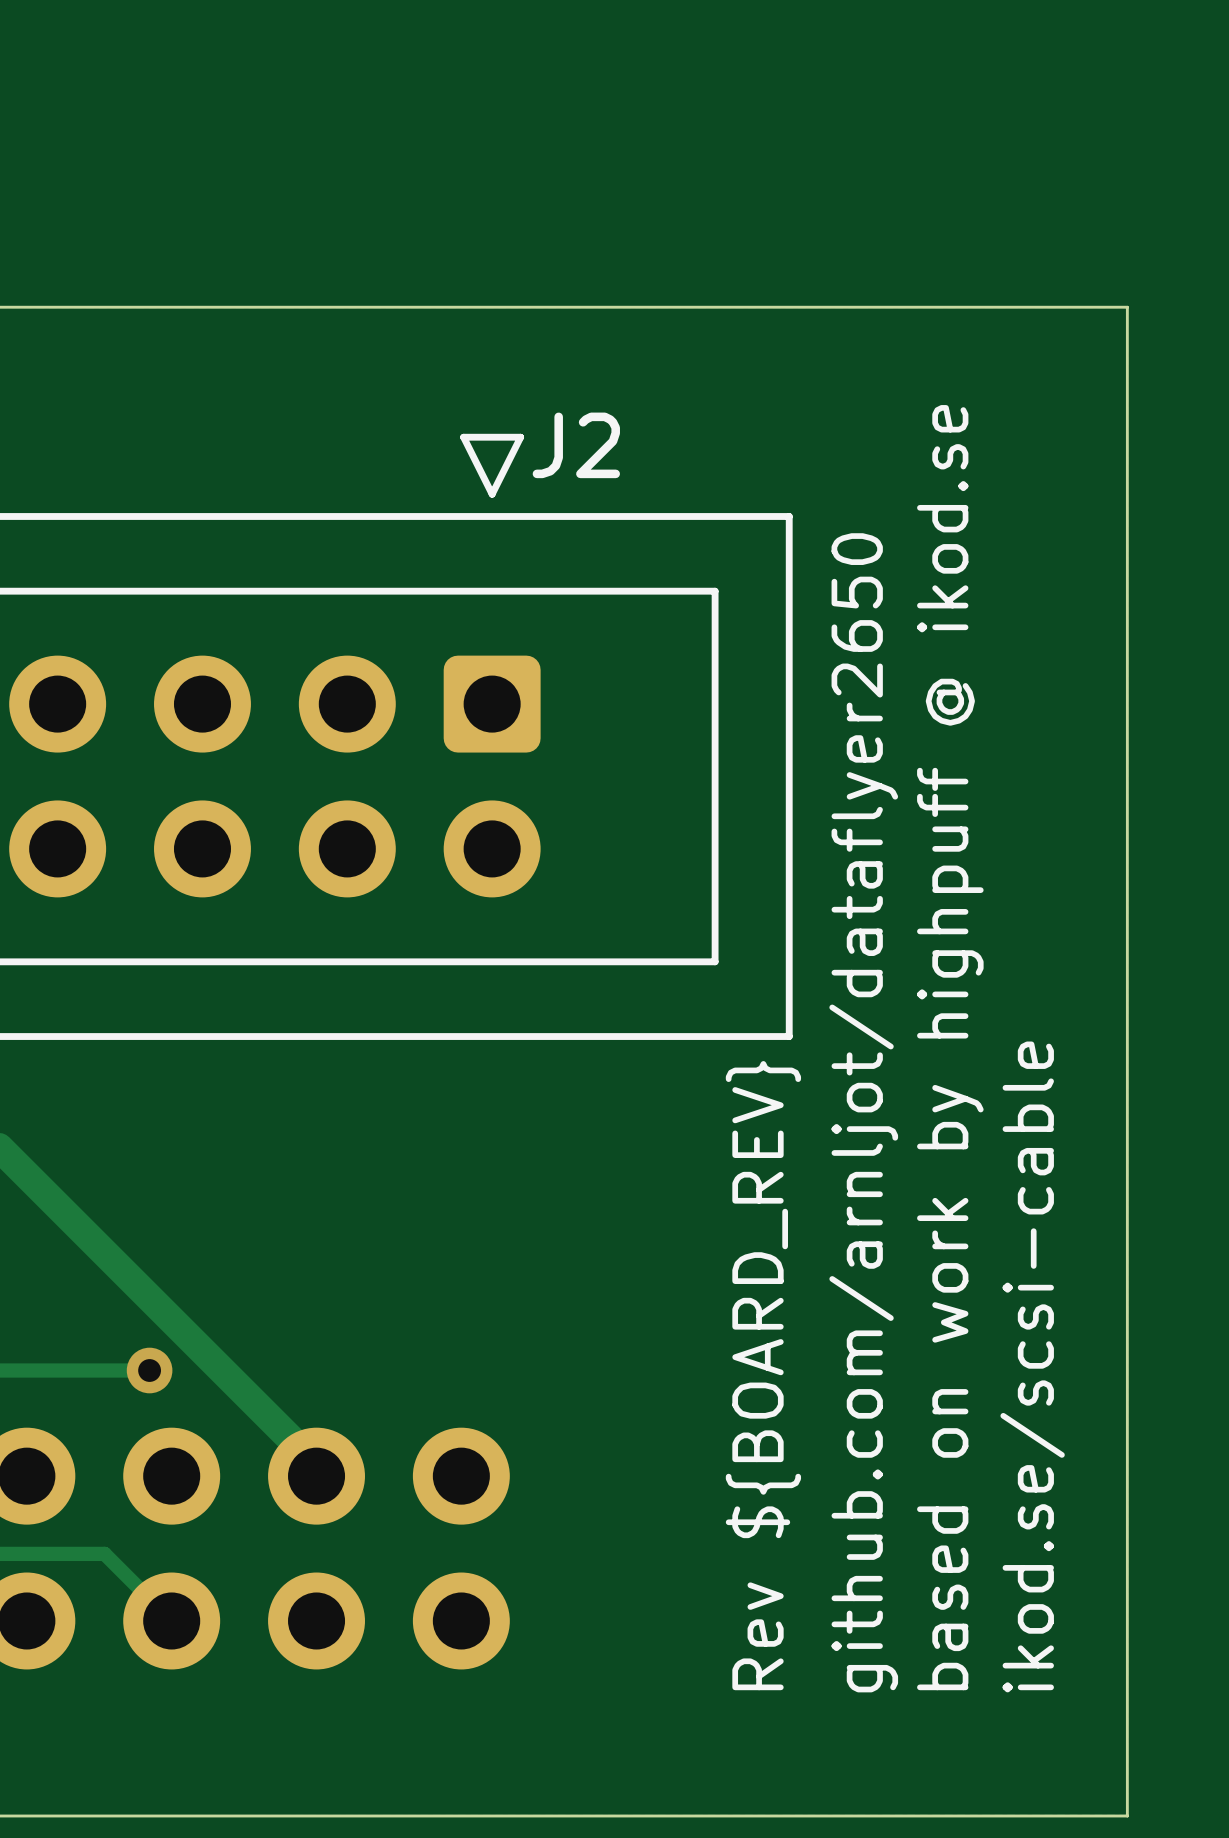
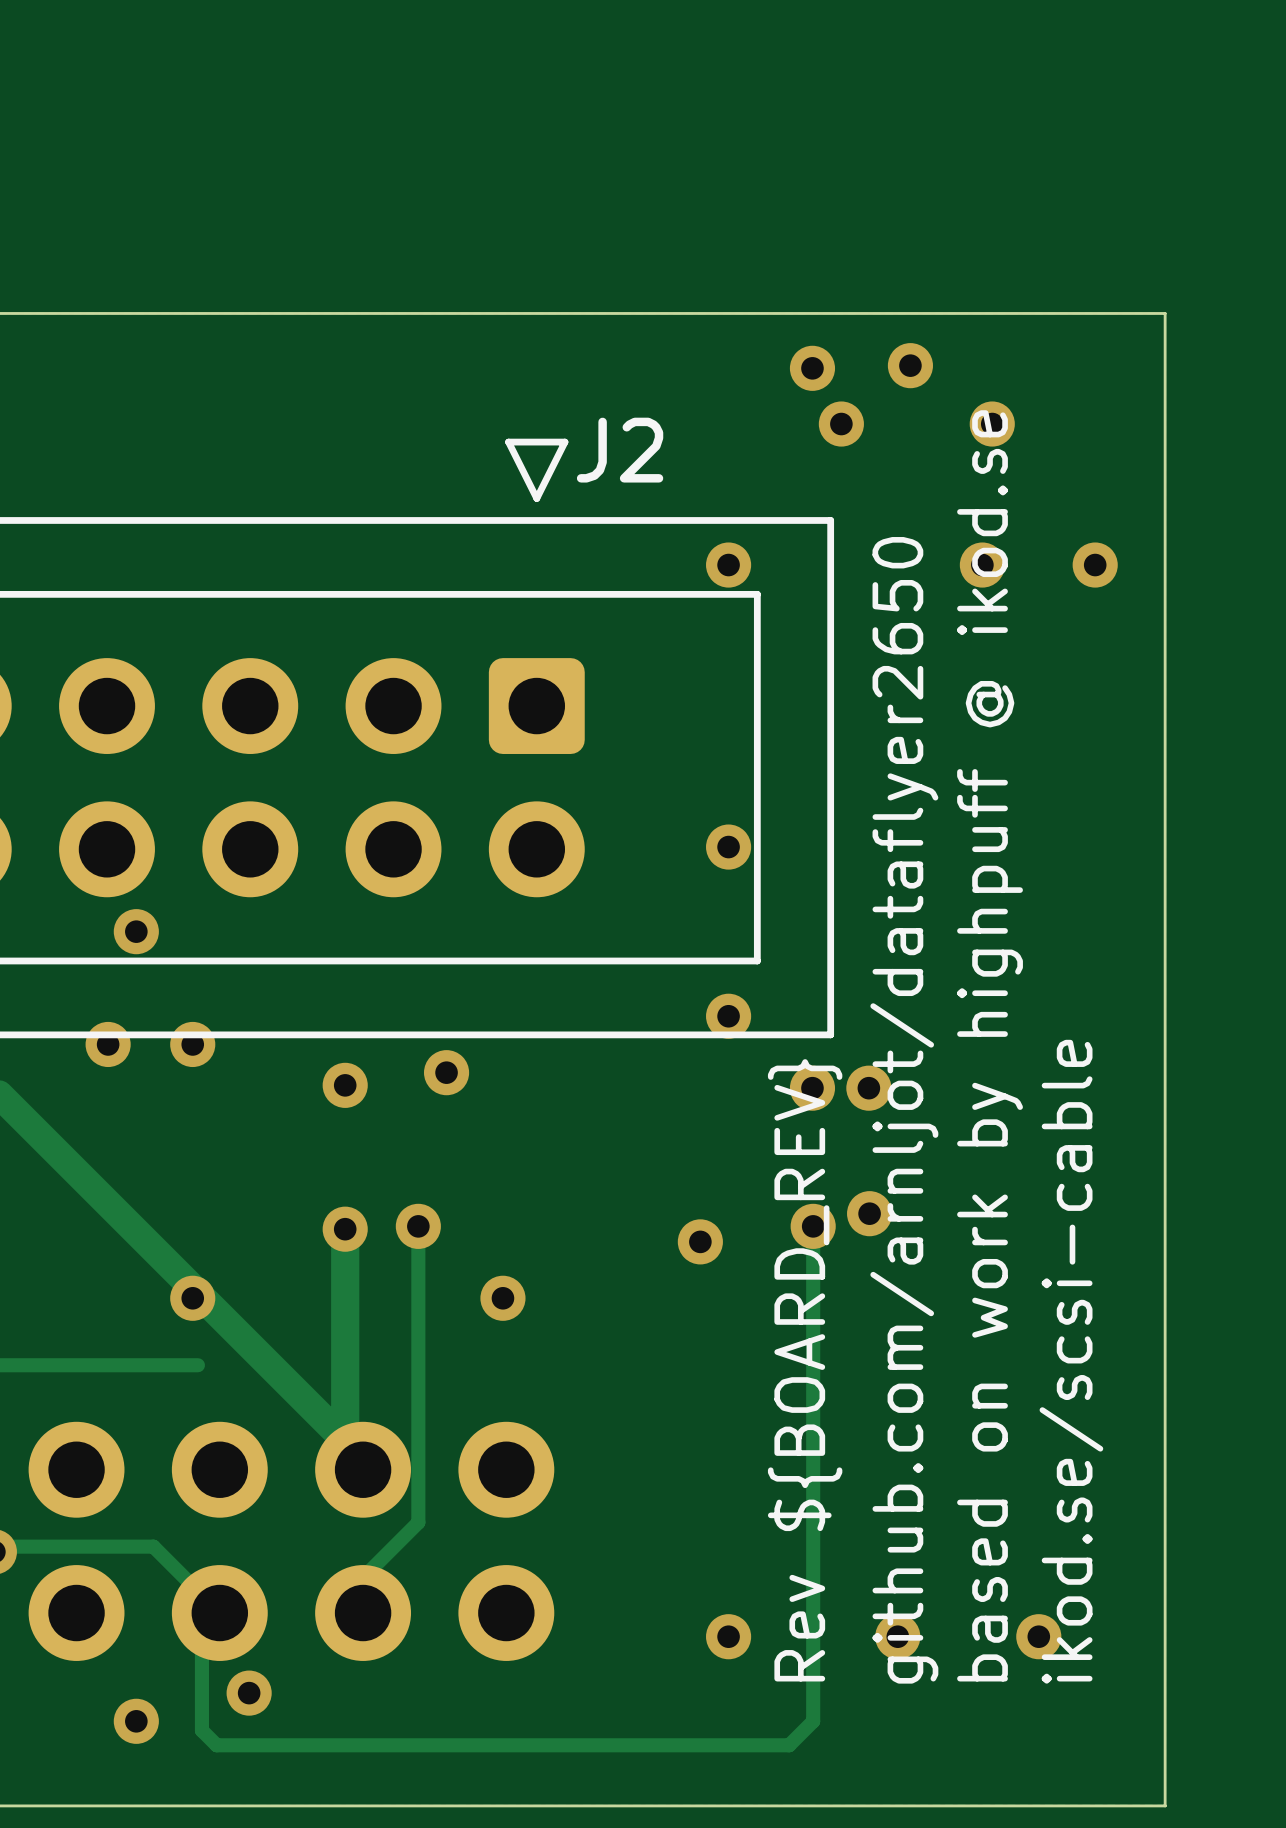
via: none -> (910, 365)
via: none -> (812, 368)
via: none -> (841, 424)
via: none -> (992, 424)
via: none -> (728, 565)
via: none -> (982, 565)
via: none -> (1095, 565)
via: none -> (728, 847)
via: none -> (136, 931)
via: none -> (728, 1016)
via: none -> (108, 1044)
via: none -> (192, 1044)
via: none -> (446, 1072)
via: none -> (345, 1085)
via: none -> (812, 1088)
via: none -> (868, 1088)
via: none -> (869, 1213)
track: none -> (418, 1226) (418, 1522) (345, 1595)
via: none -> (418, 1226)
track: none -> (813, 1226) (813, 1721) (789, 1745) (216, 1745) (201, 1730) (201, 1595)
via: none -> (813, 1226)
track: none -> (345, 1229) (345, 1452)
via: none -> (345, 1229)
via: none -> (700, 1241)
via: none -> (502, 1298)
via position: (149, 1370) -> (192, 1298)
via: none -> (728, 1636)
via: none -> (897, 1636)
via: none -> (1038, 1636)
via: none -> (249, 1693)
via: none -> (136, 1721)

